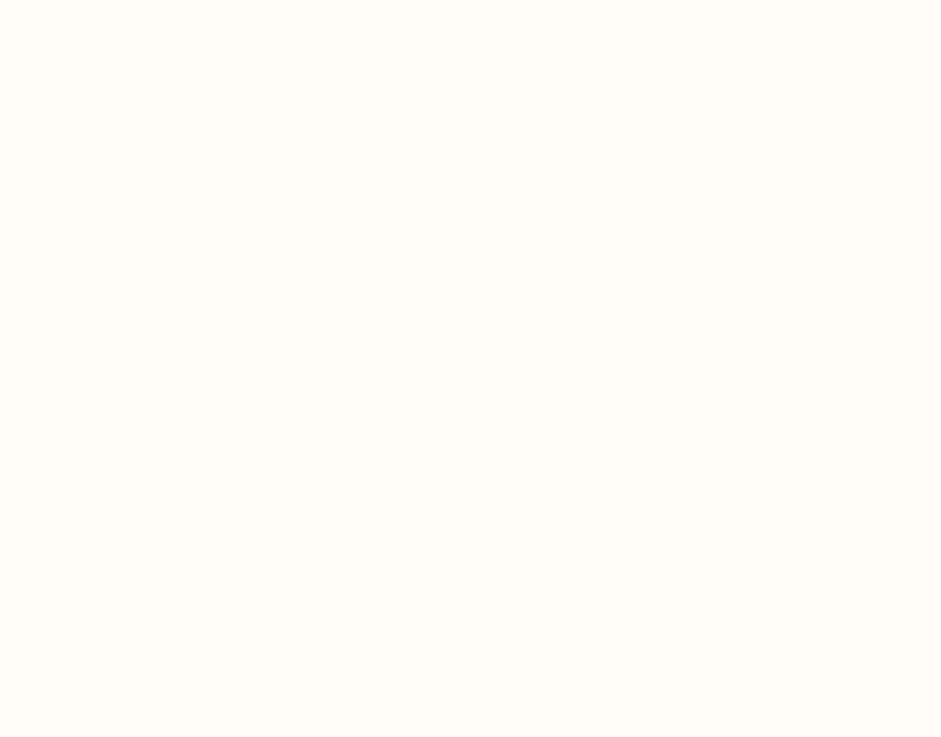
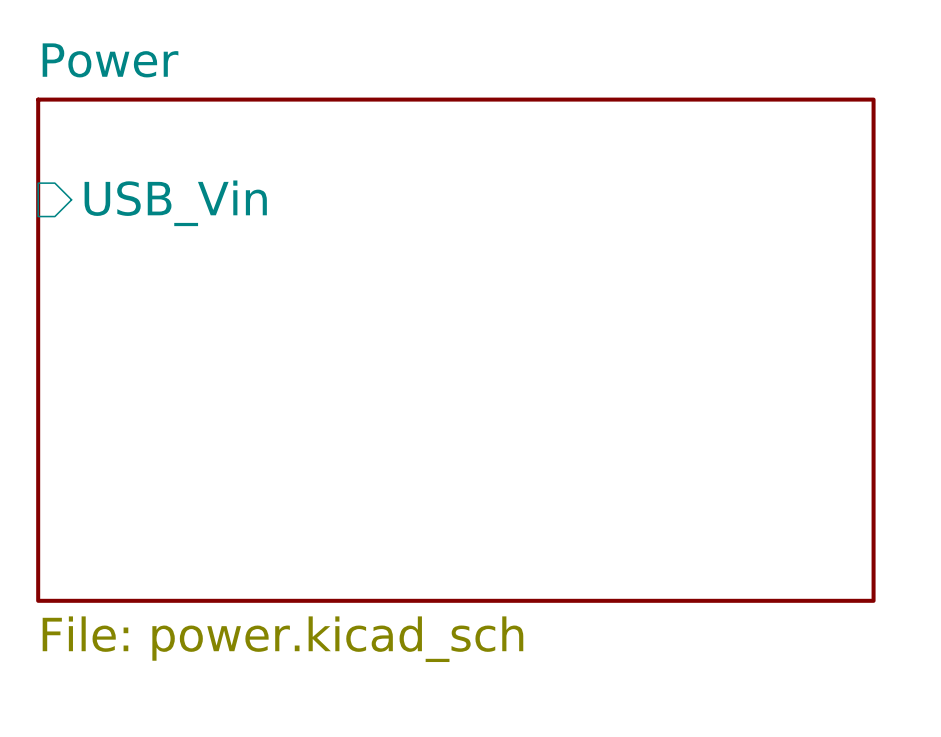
sheet pin: none -> USB_Vin (175, 203)
sheet Power: none -> File: power.kicad_sch (455, 350)

